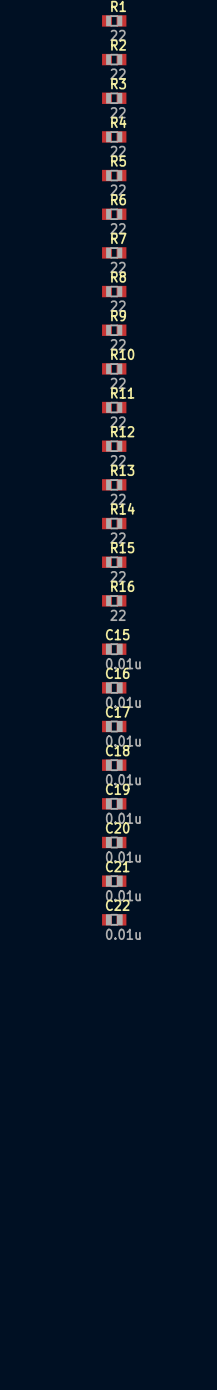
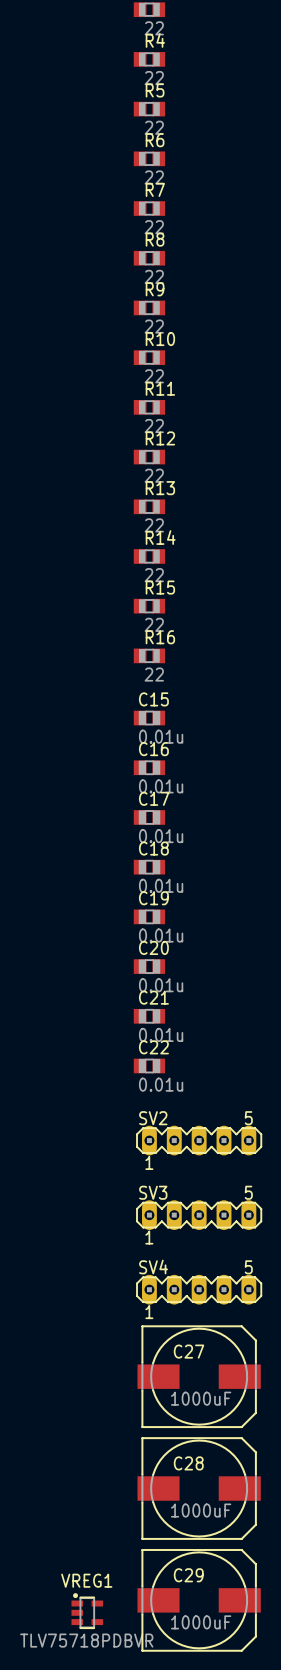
SV2: none -> (199, 1140)
SV3: none -> (199, 1215)
SV4: none -> (199, 1289)
C27: none -> 1000uF (199, 1376)
C28: none -> 1000uF (199, 1488)
C29: none -> 1000uF (199, 1600)
VREG1: none -> TLV75718PDBVR (87, 1610)

